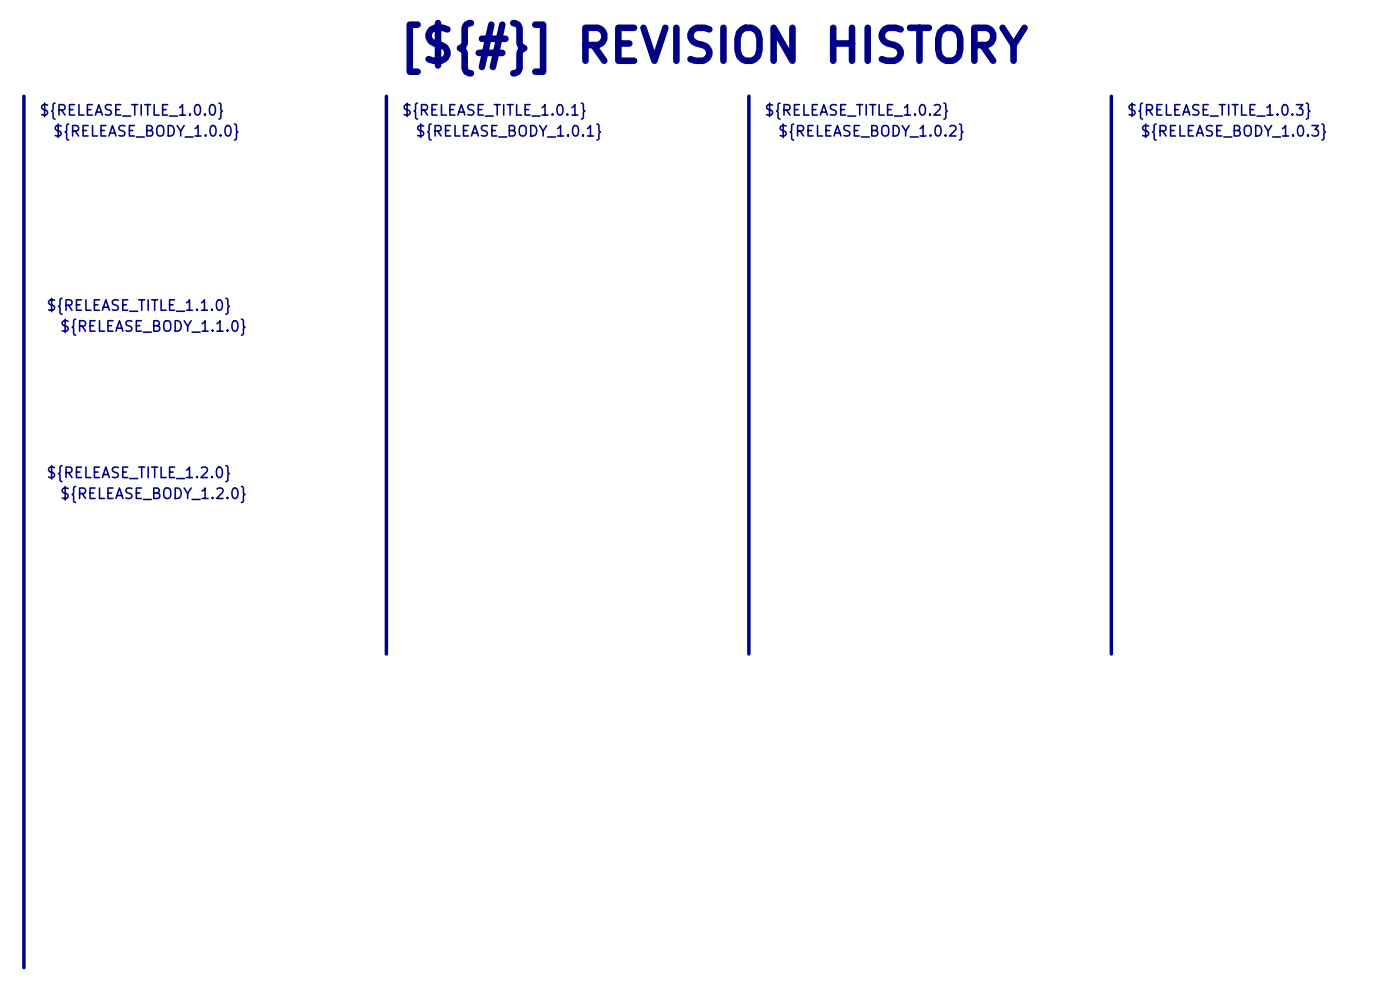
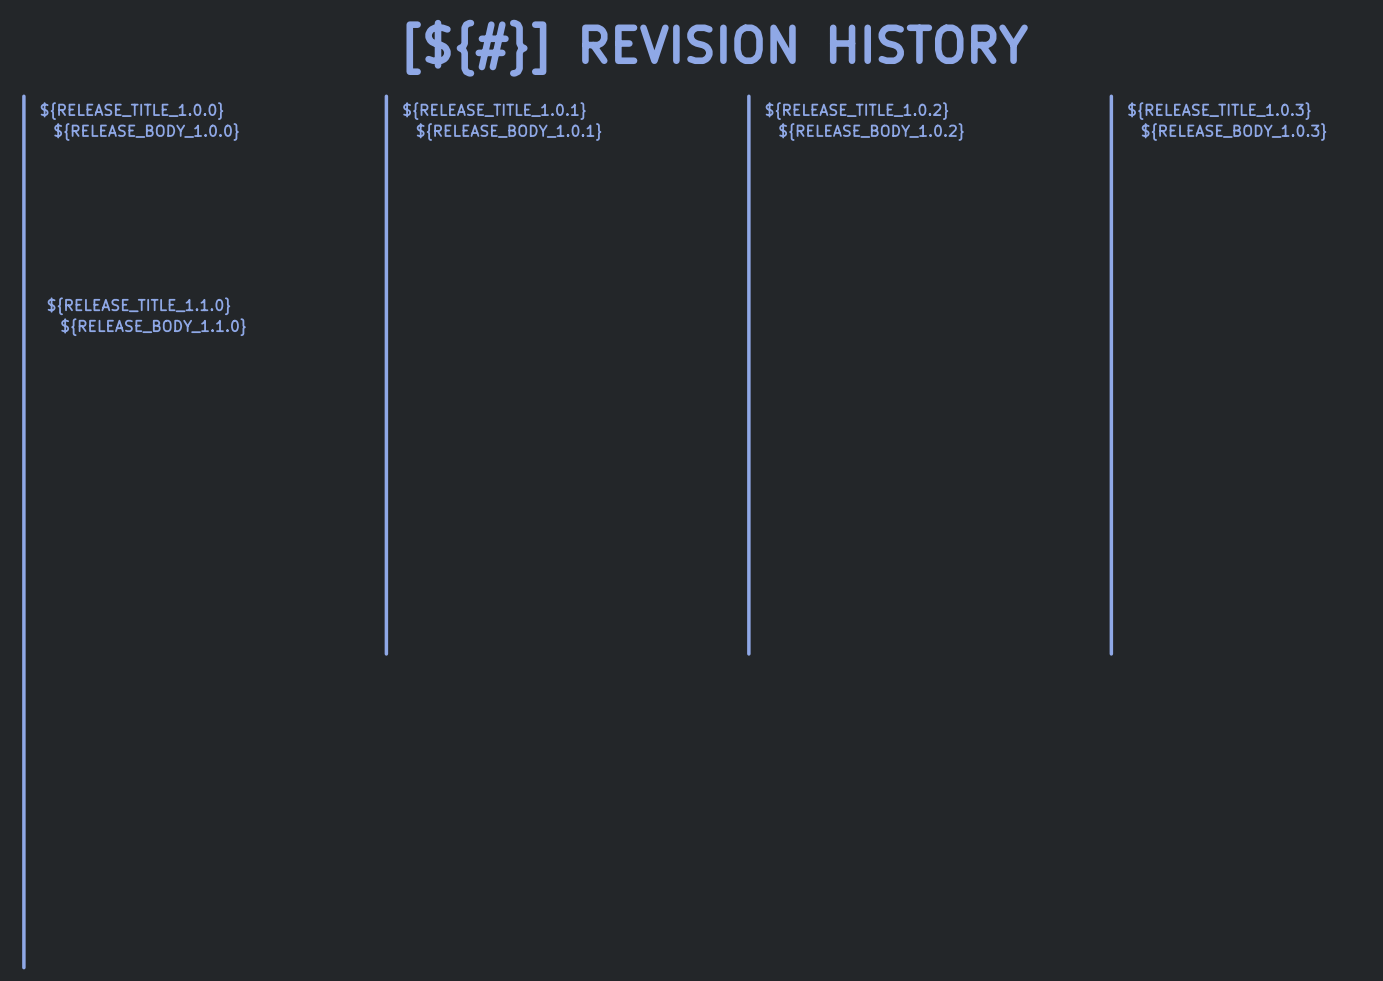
text: ${RELEASE_TITLE_1.2.0} (138, 473) -> none
text: ${RELEASE_BODY_1.2.0} (153, 494) -> none

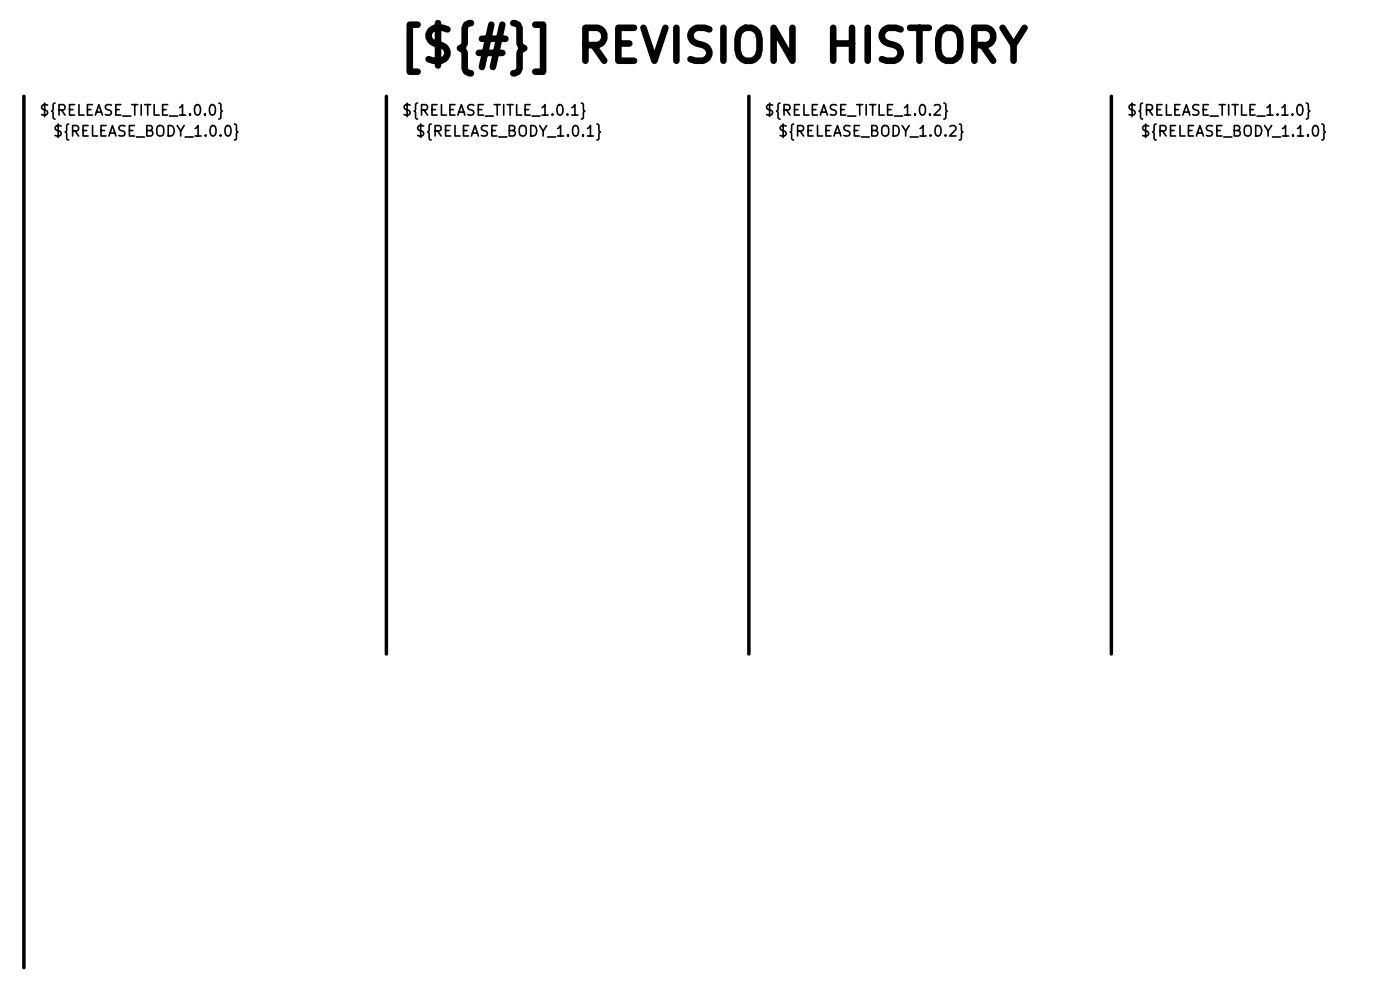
text: ${RELEASE_TITLE_1.0.3} (1219, 111) -> ${RELEASE_TITLE_1.1.0} (1219, 111)
text: ${RELEASE_BODY_1.0.3} (1234, 132) -> ${RELEASE_BODY_1.1.0} (1234, 132)
text: ${RELEASE_TITLE_1.1.0} (138, 306) -> none
text: ${RELEASE_BODY_1.1.0} (153, 327) -> none

